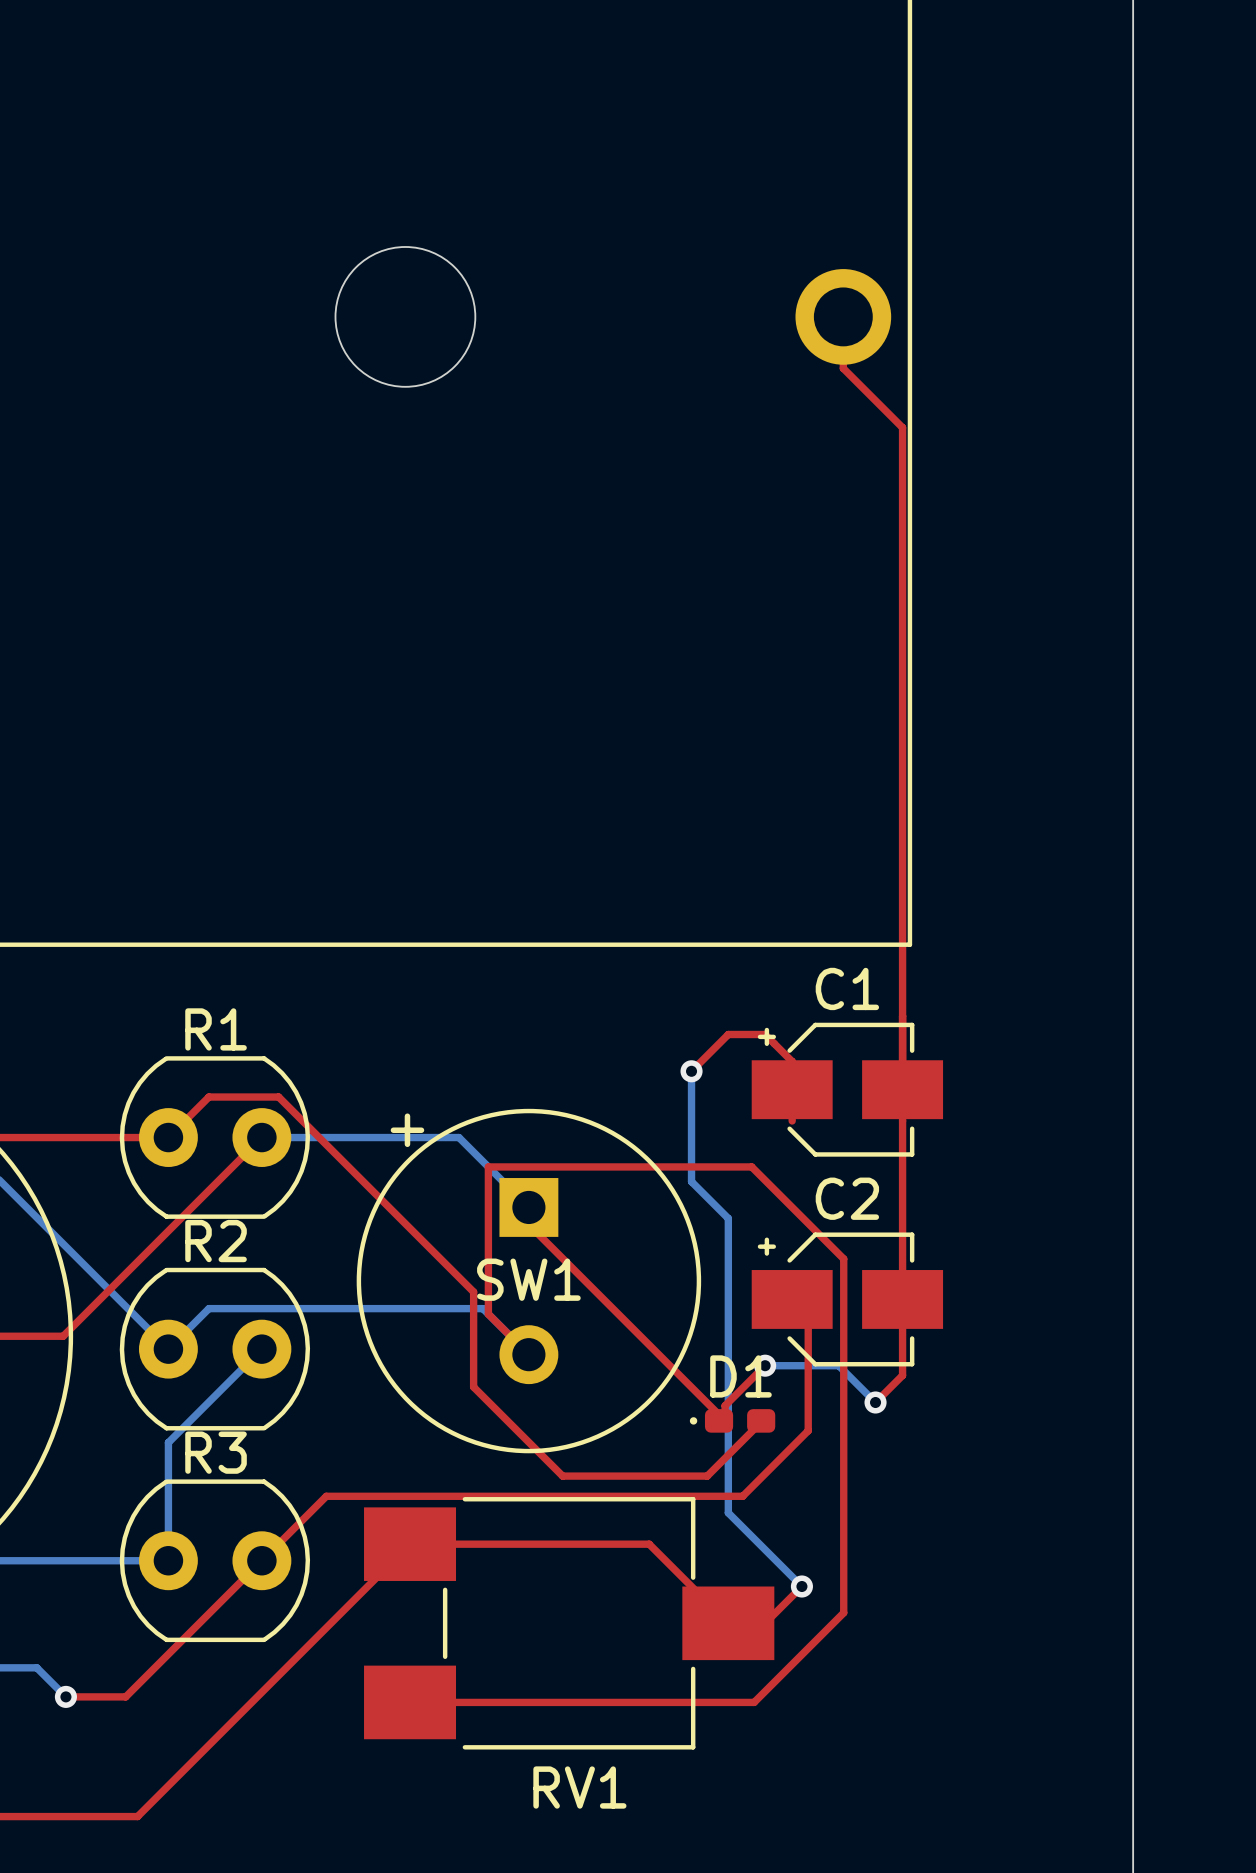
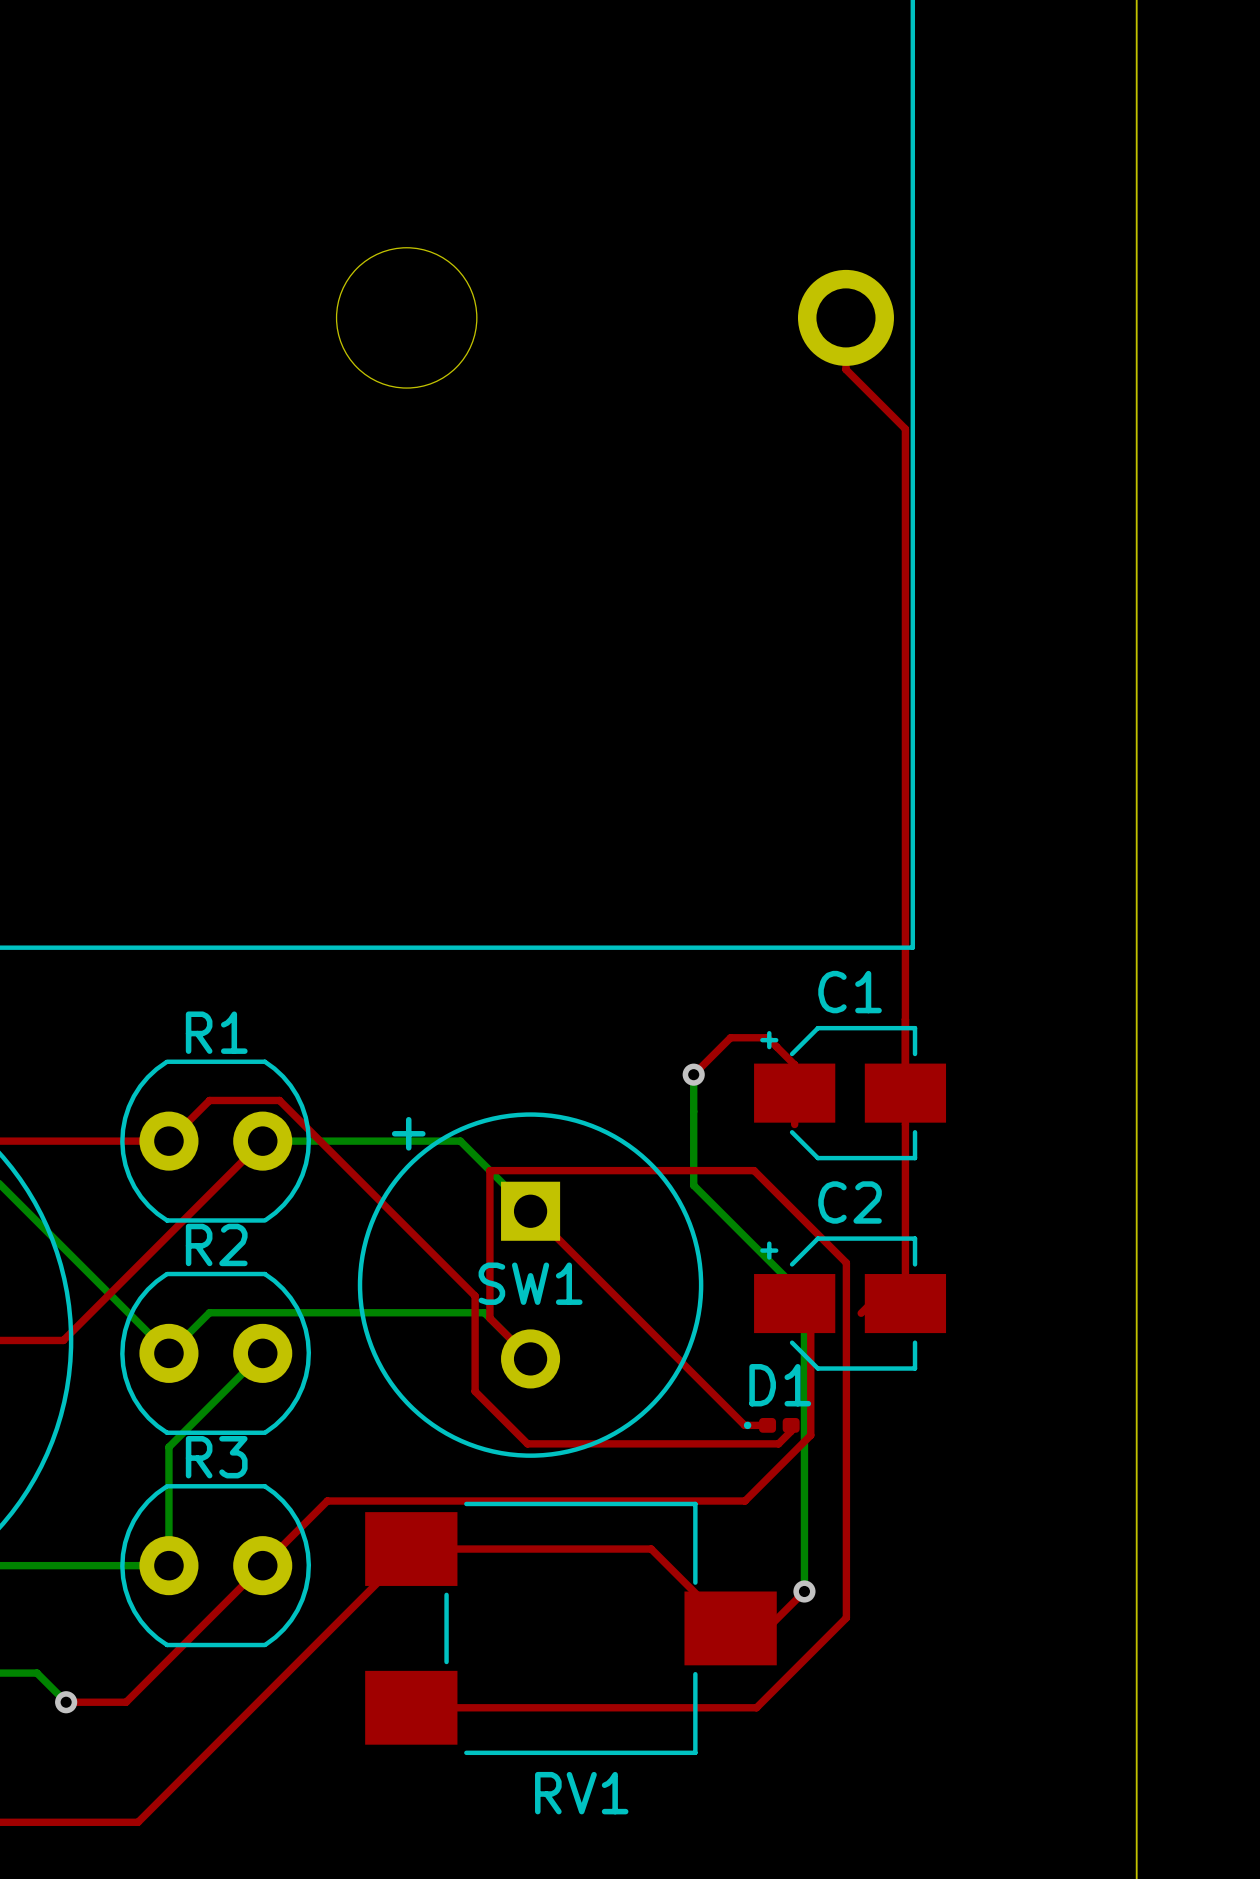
top track: (528, 1207) (528, 1224) (725, 1420) (725, 1405) (765, 1365) -> (530, 1211) (744, 1425) (767, 1425)
bottom track: (728, 1218) (728, 1512) (801, 1586) -> (730, 1222) (804, 1296) (804, 1591)
top track: none -> (870, 1303) (861, 1313)
top track: (902, 1299) (902, 1375) (875, 1402) -> none
bottom track: (765, 1365) (838, 1365) (875, 1402) -> none
via: (765, 1365) -> none
via: (875, 1402) -> none
D1 footprint: [689, 1409, 776, 1433] -> [743, 1417, 800, 1433]
top track: (755, 1420) (755, 1428) (707, 1476) (562, 1476) (525, 1439) -> (791, 1425) (791, 1431) (778, 1443) (527, 1443)

